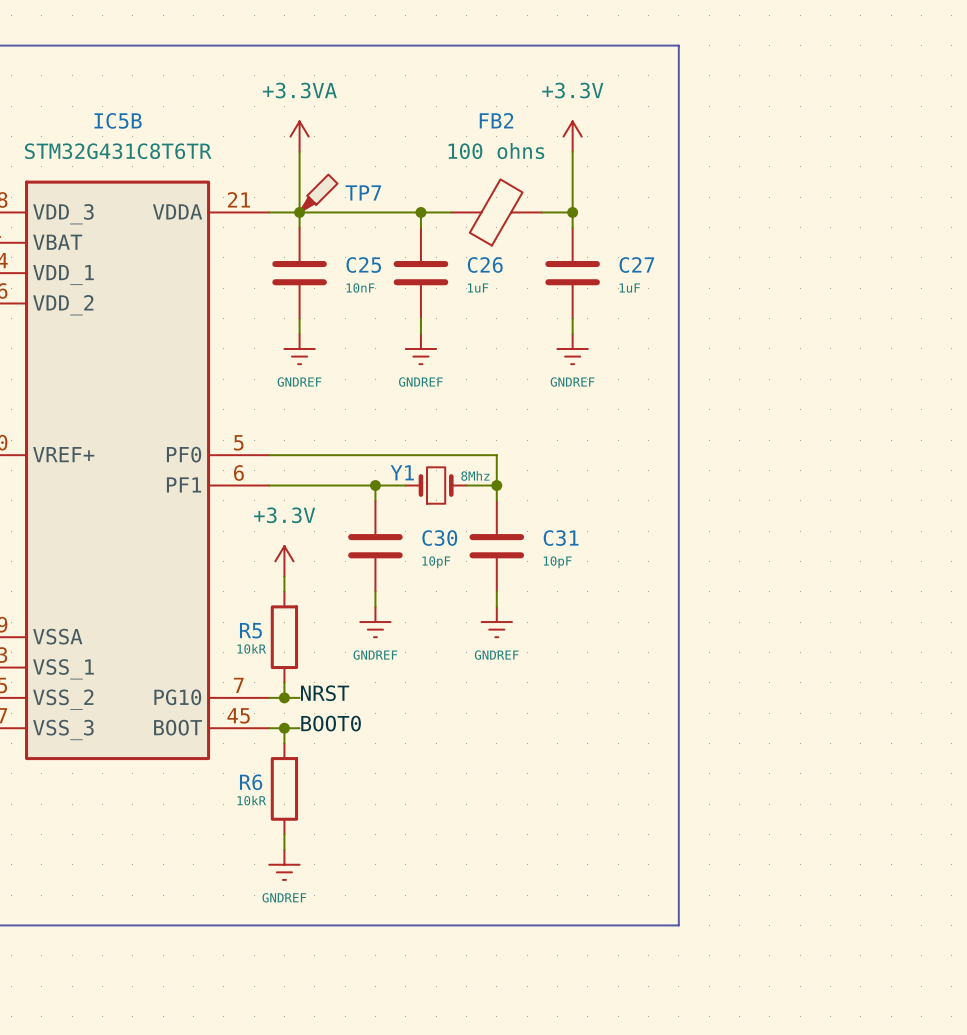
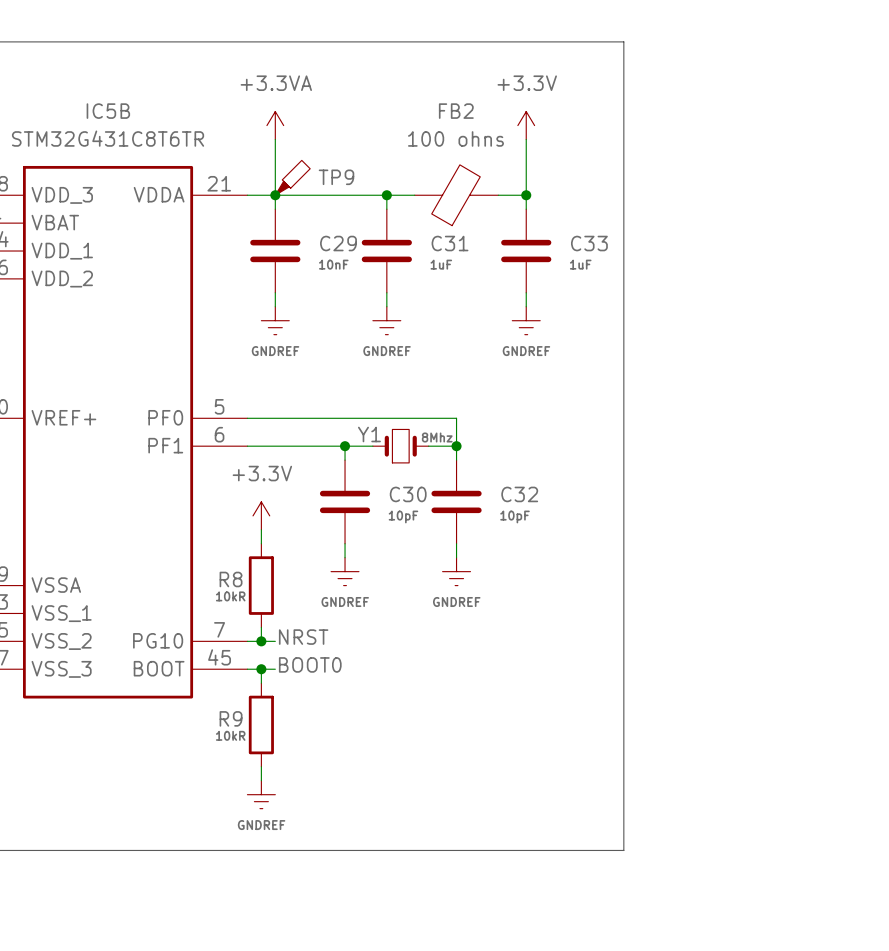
TP7 name: TP7 (363, 192) -> TP9 (336, 177)
C25 name: C25 (363, 265) -> C29 (338, 243)
C26 name: C26 (485, 265) -> C31 (450, 243)
C27 name: C27 (636, 265) -> C33 (589, 243)
C31 name: C31 (561, 538) -> C32 (519, 494)
R5 name: R5 (250, 630) -> R8 (231, 579)
R6 name: R6 (251, 782) -> R9 (231, 718)

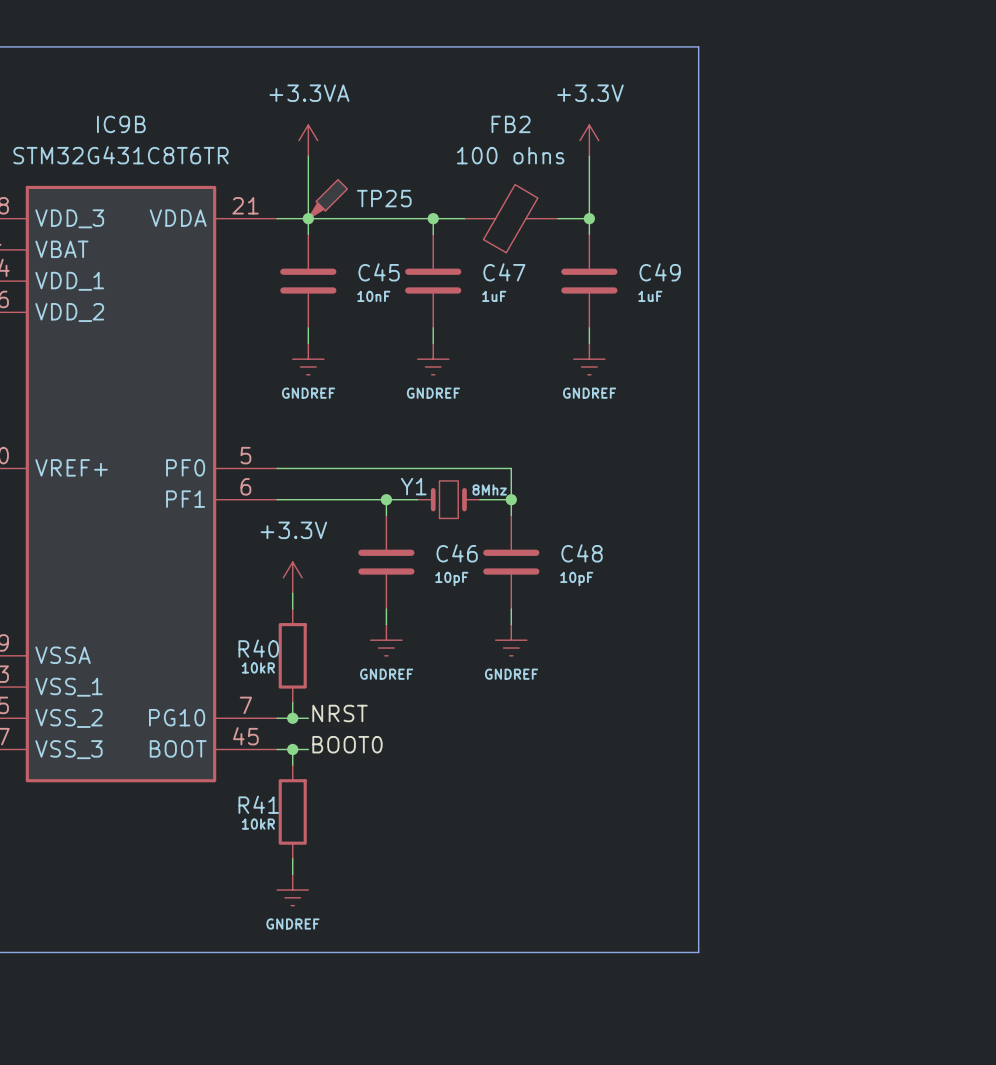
IC5B name: IC5B (108, 111) -> IC9B (121, 124)
TP9 name: TP9 (336, 177) -> TP25 (384, 198)
C29 name: C29 (338, 243) -> C45 (379, 272)
C31 name: C31 (450, 243) -> C47 (504, 272)
C33 name: C33 (589, 243) -> C49 (660, 272)
C30 name: C30 (408, 494) -> C46 (457, 553)
C32 name: C32 (519, 494) -> C48 (582, 553)
R8 name: R8 (231, 579) -> R40 (258, 648)
R9 name: R9 (231, 718) -> R41 (258, 804)

